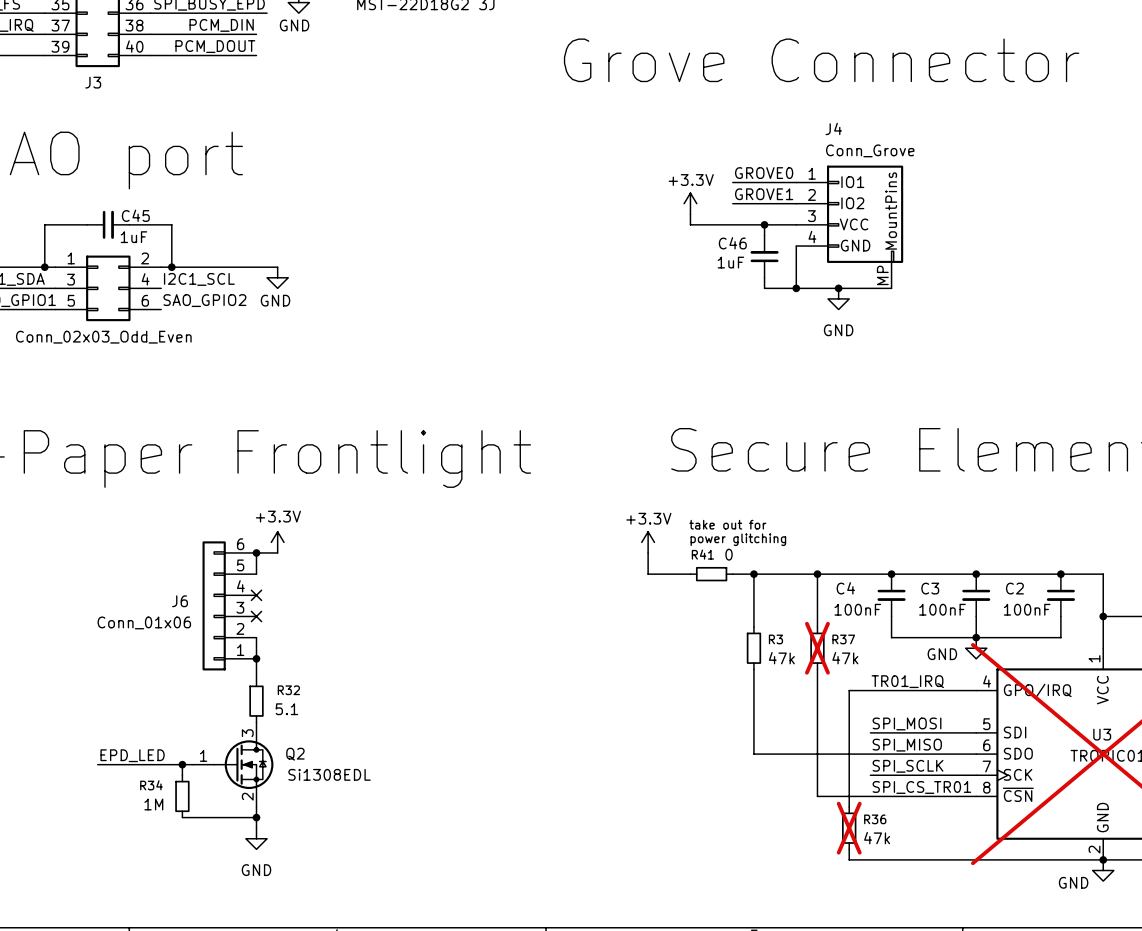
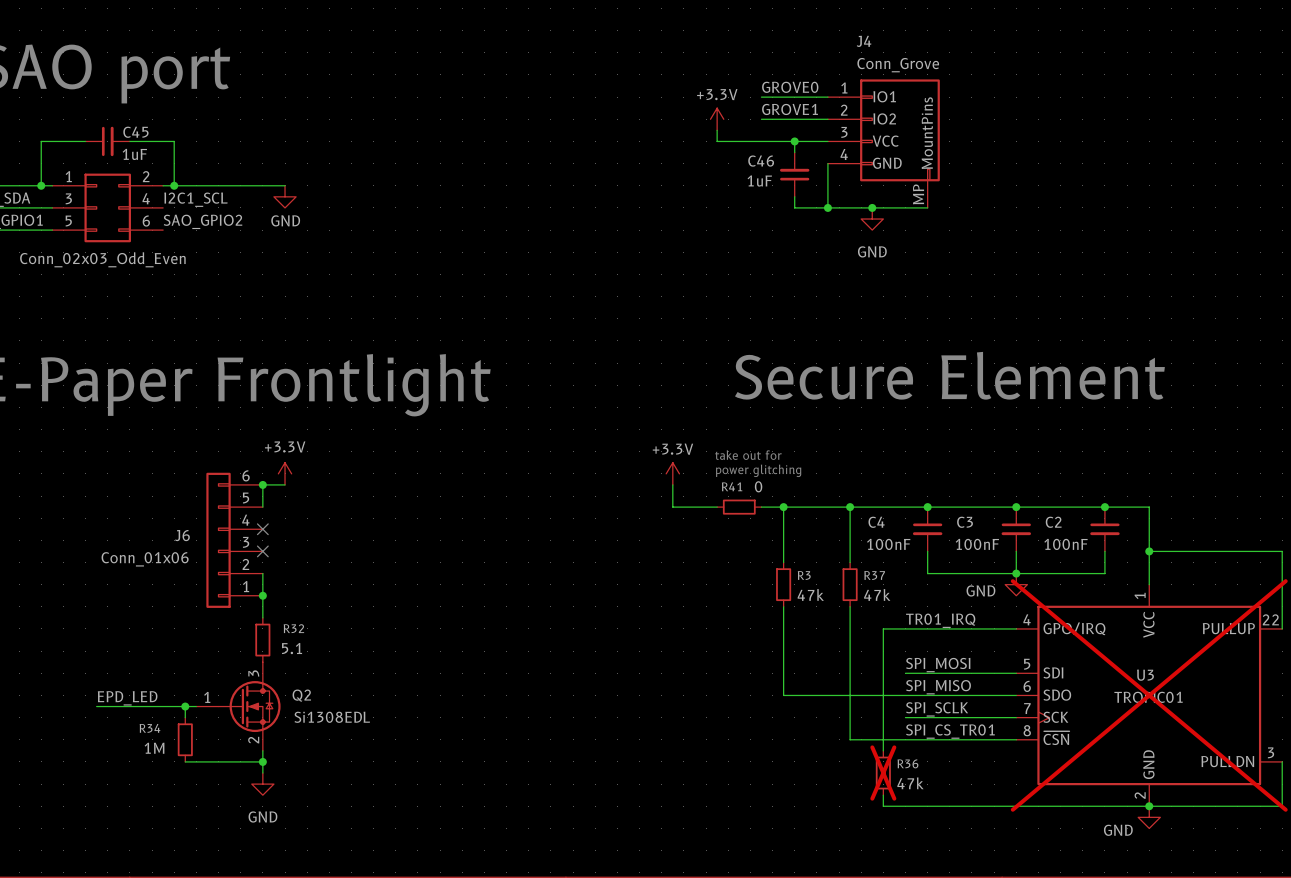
R37 do-not-place cross: (817, 648) -> none

